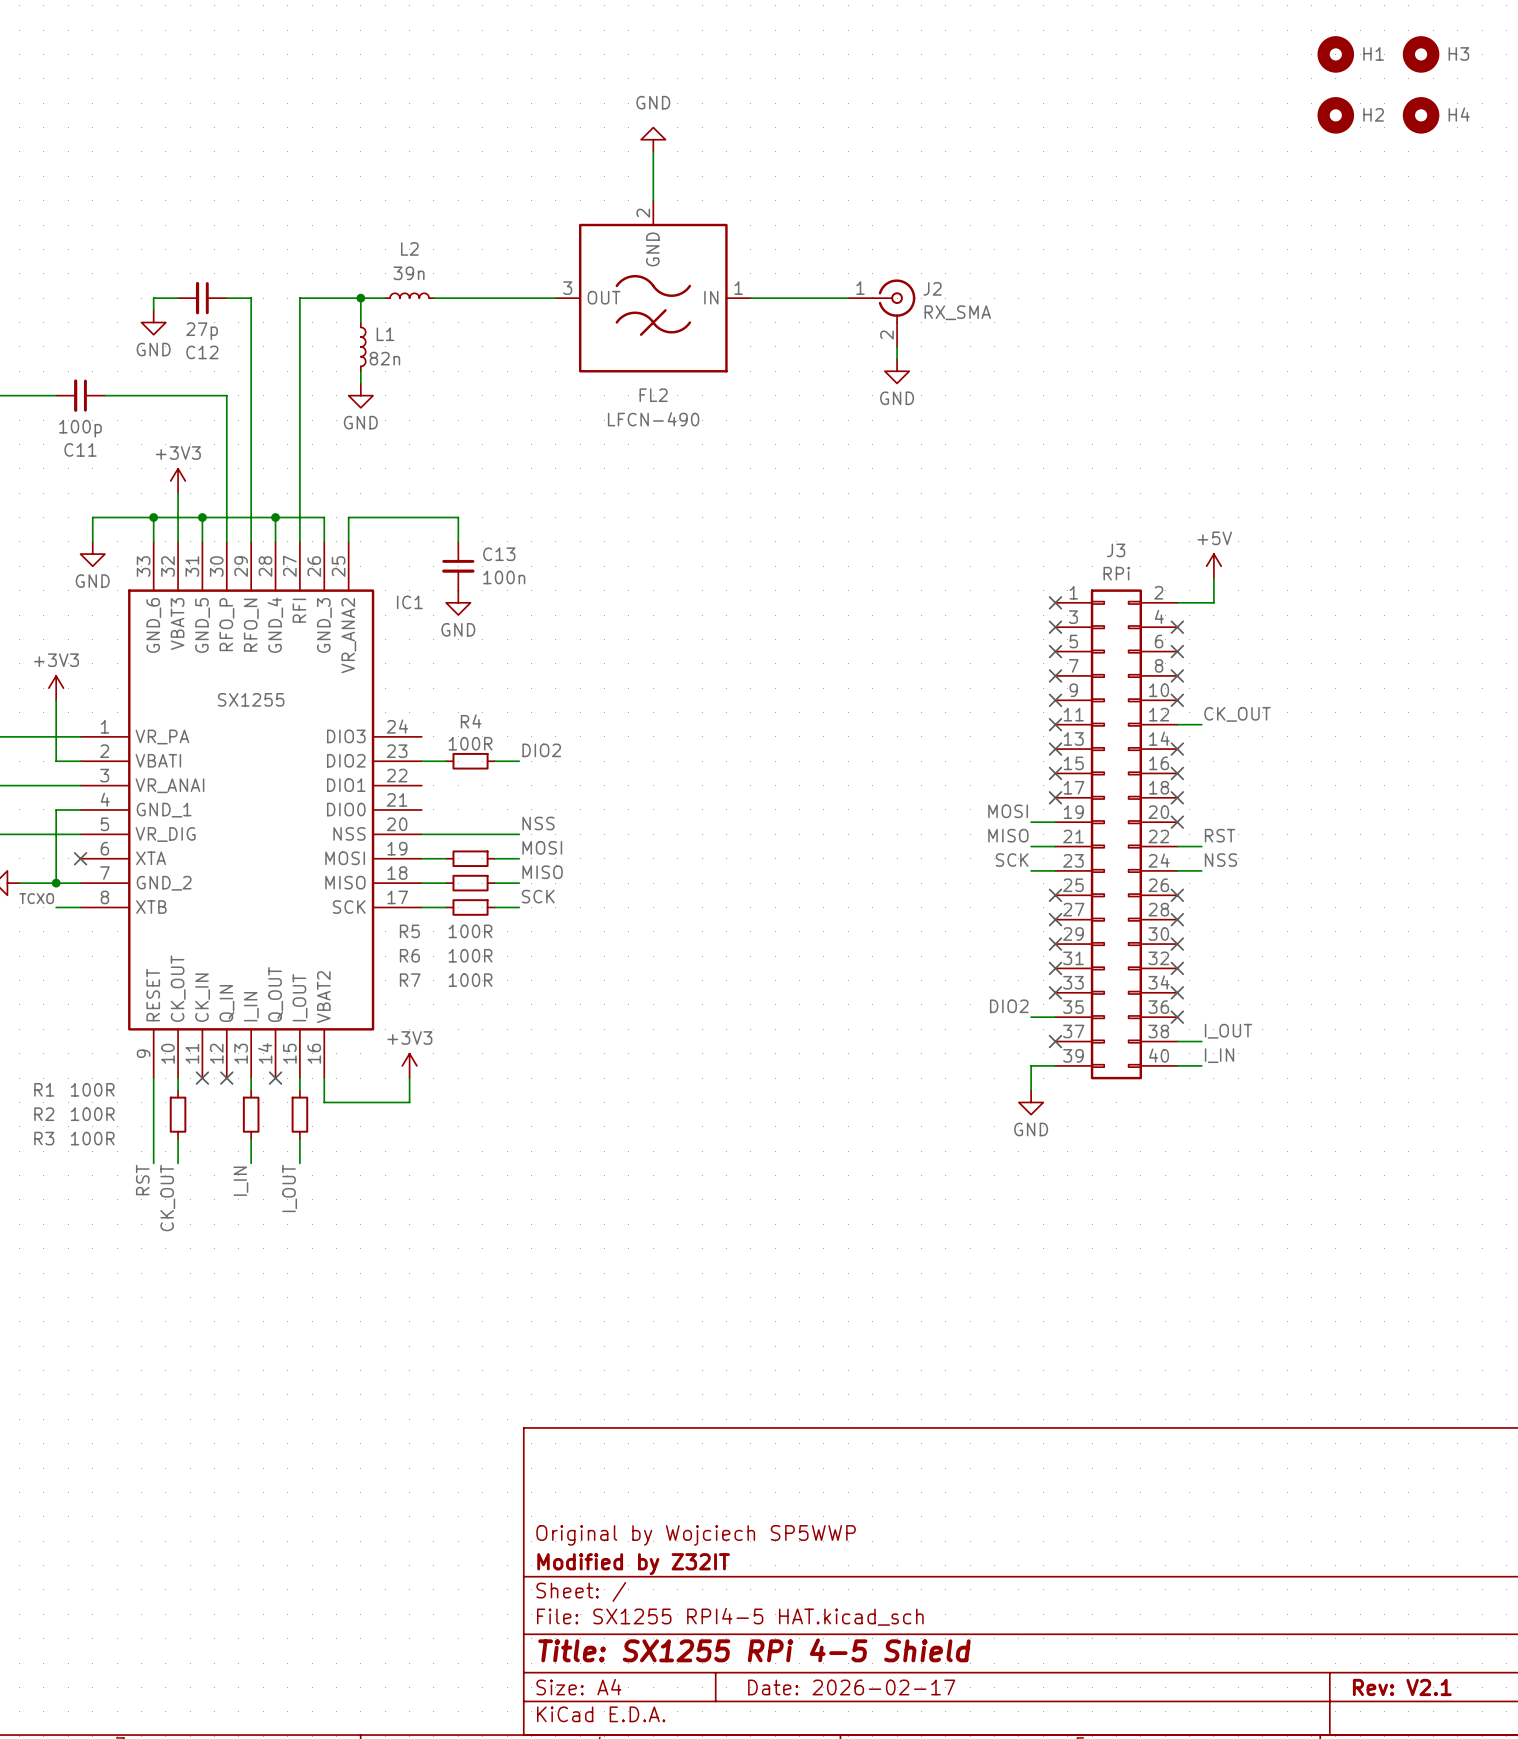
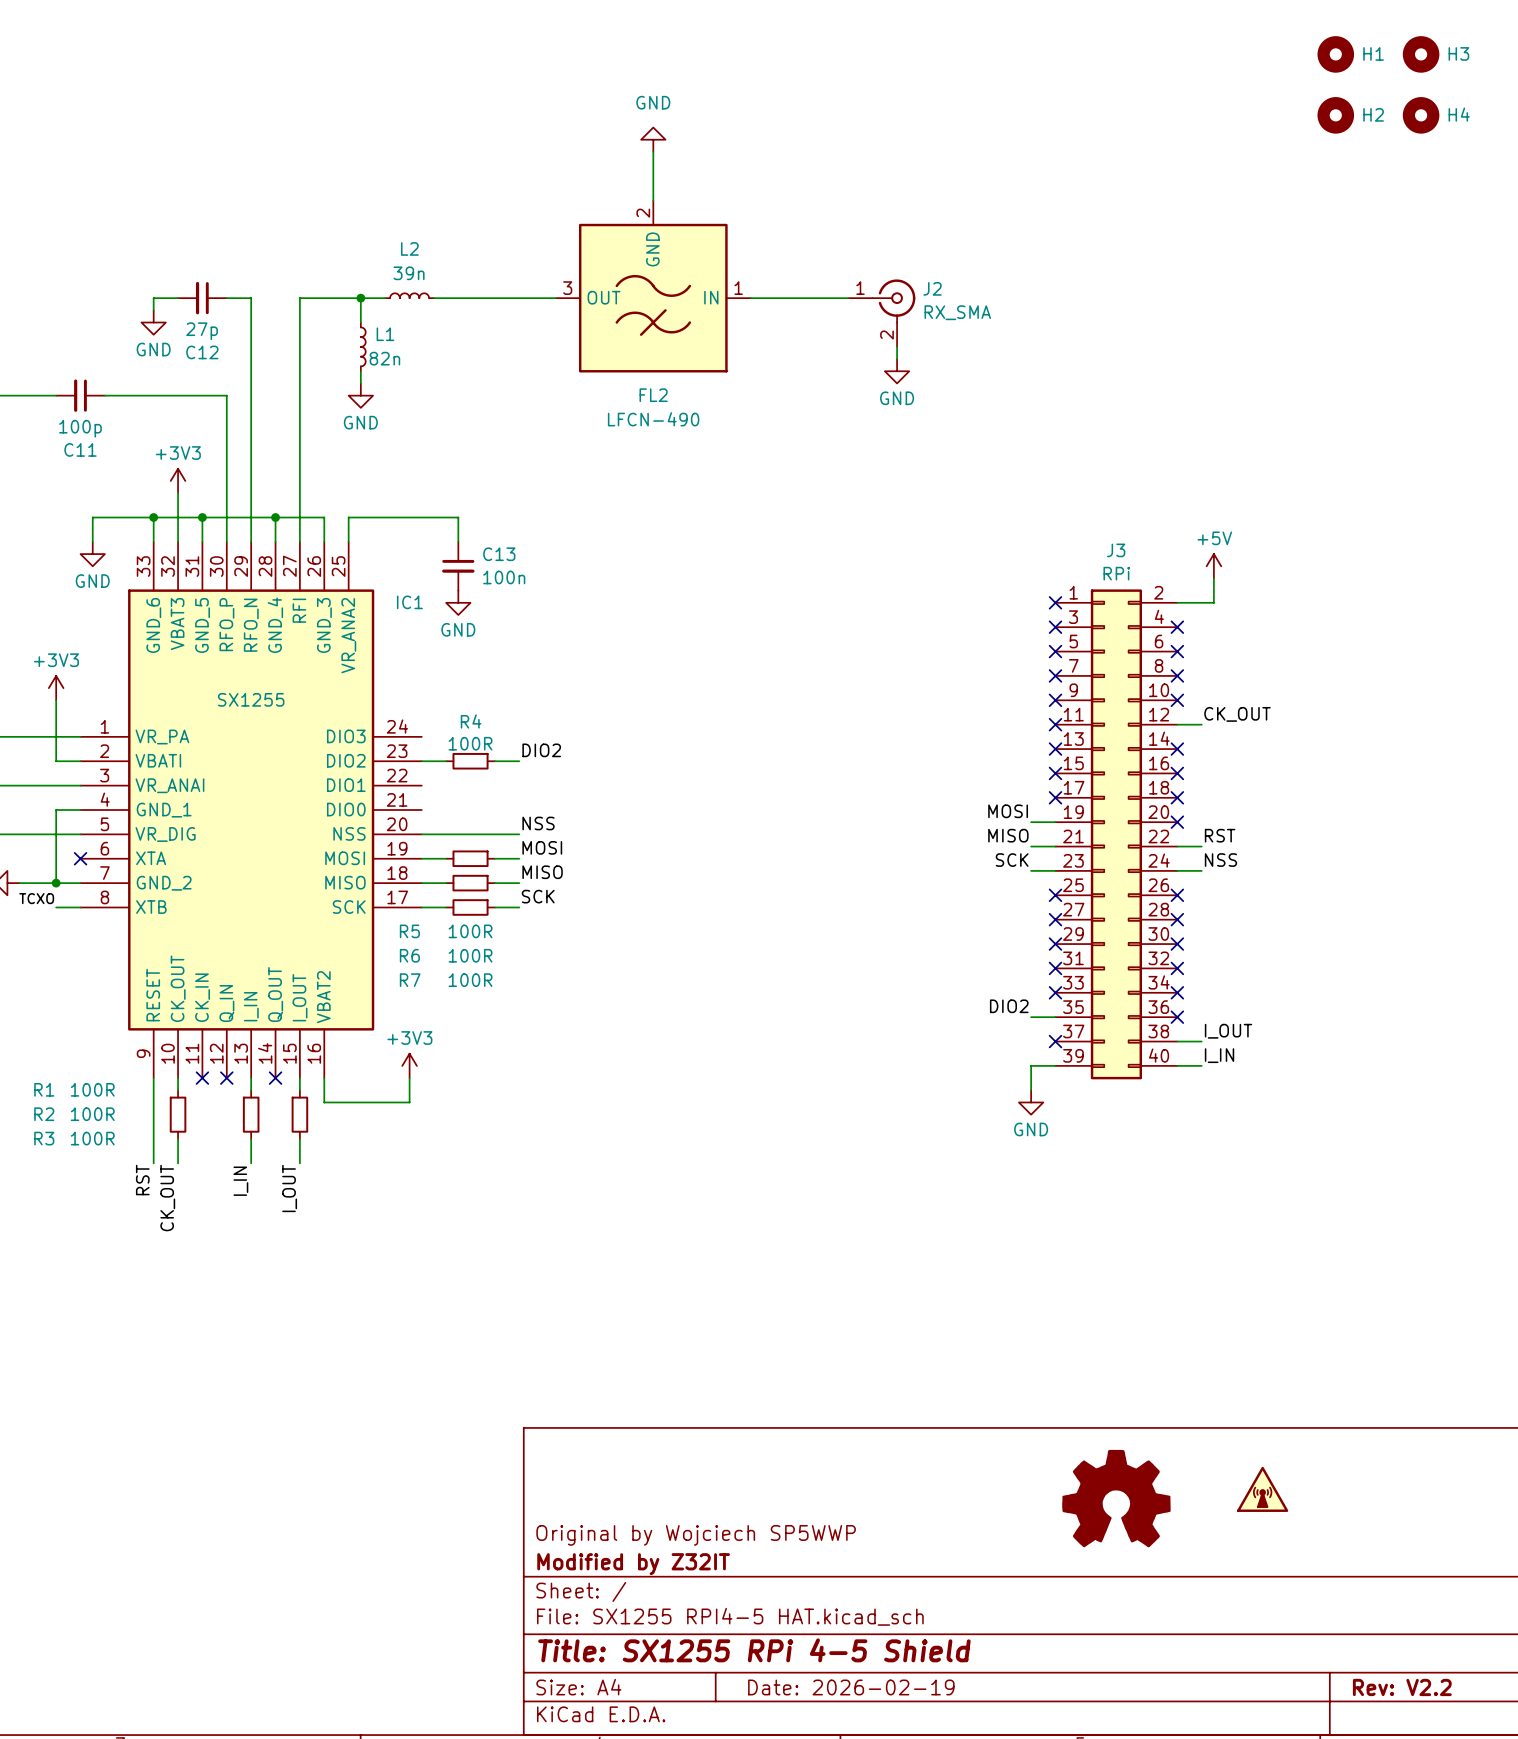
power symbol: none -> (1262, 1489)
power symbol: none -> (1116, 1498)
title block: Date: 2026-02-17 (851, 1687) -> Date: 2026-02-19 (851, 1687)
title block: Rev: V2.1 (1402, 1687) -> Rev: V2.2 (1402, 1687)

